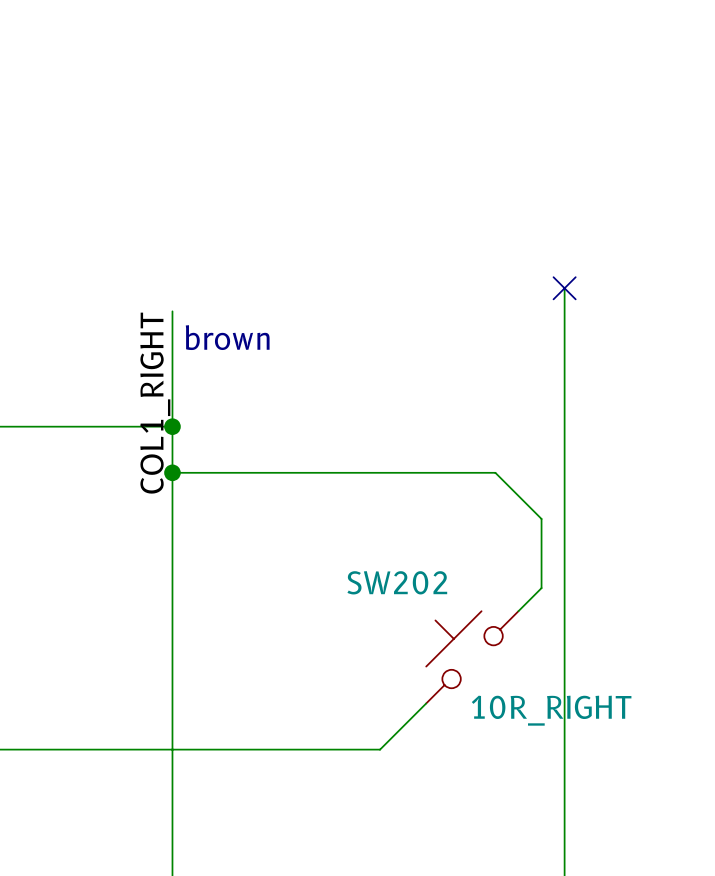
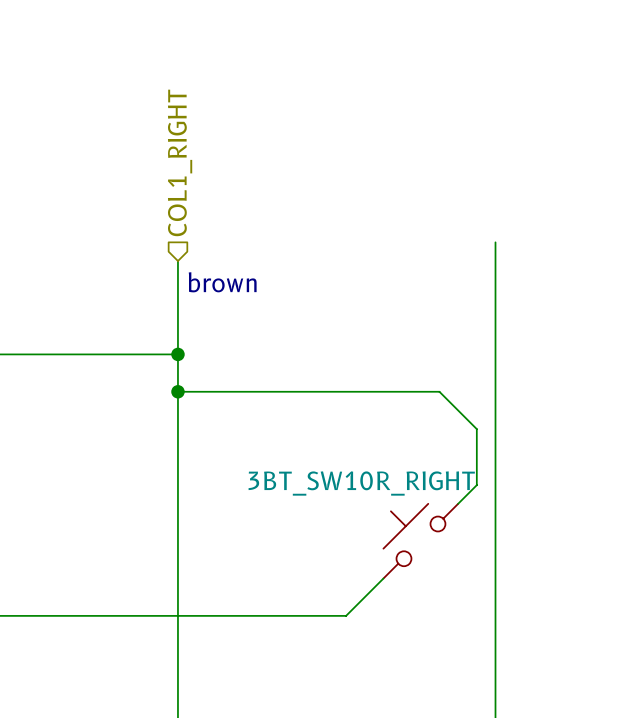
hierarchical label: none -> COL1_RIGHT (180, 162)
no-connect mark: (564, 288) -> none
label: COL1_RIGHT (155, 403) -> none
SW202 name: SW202 (397, 582) -> 3BT_SW10R_RIGHT (361, 483)
SW202 value: 10R_RIGHT (551, 710) -> none

